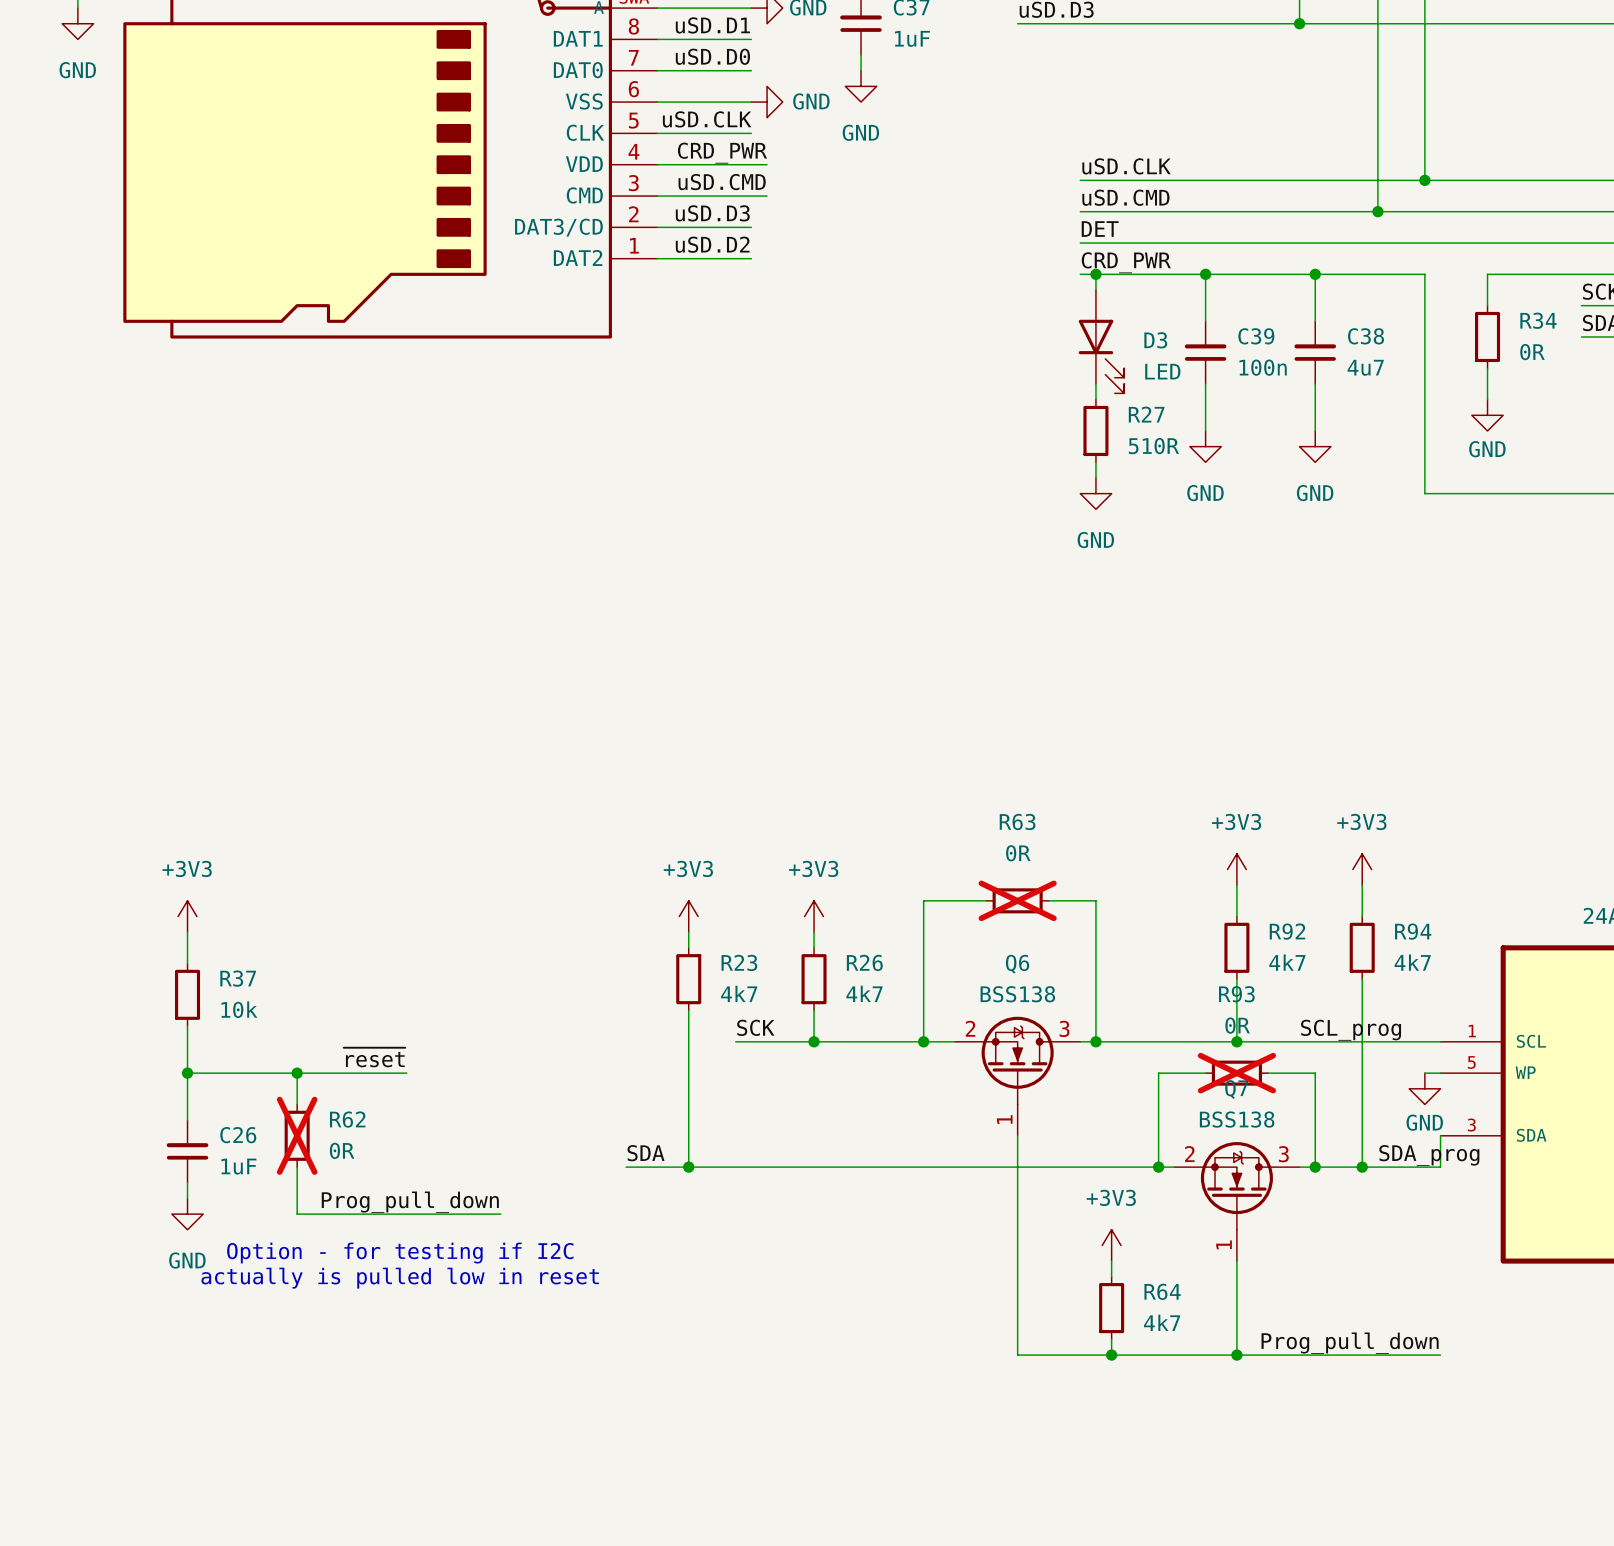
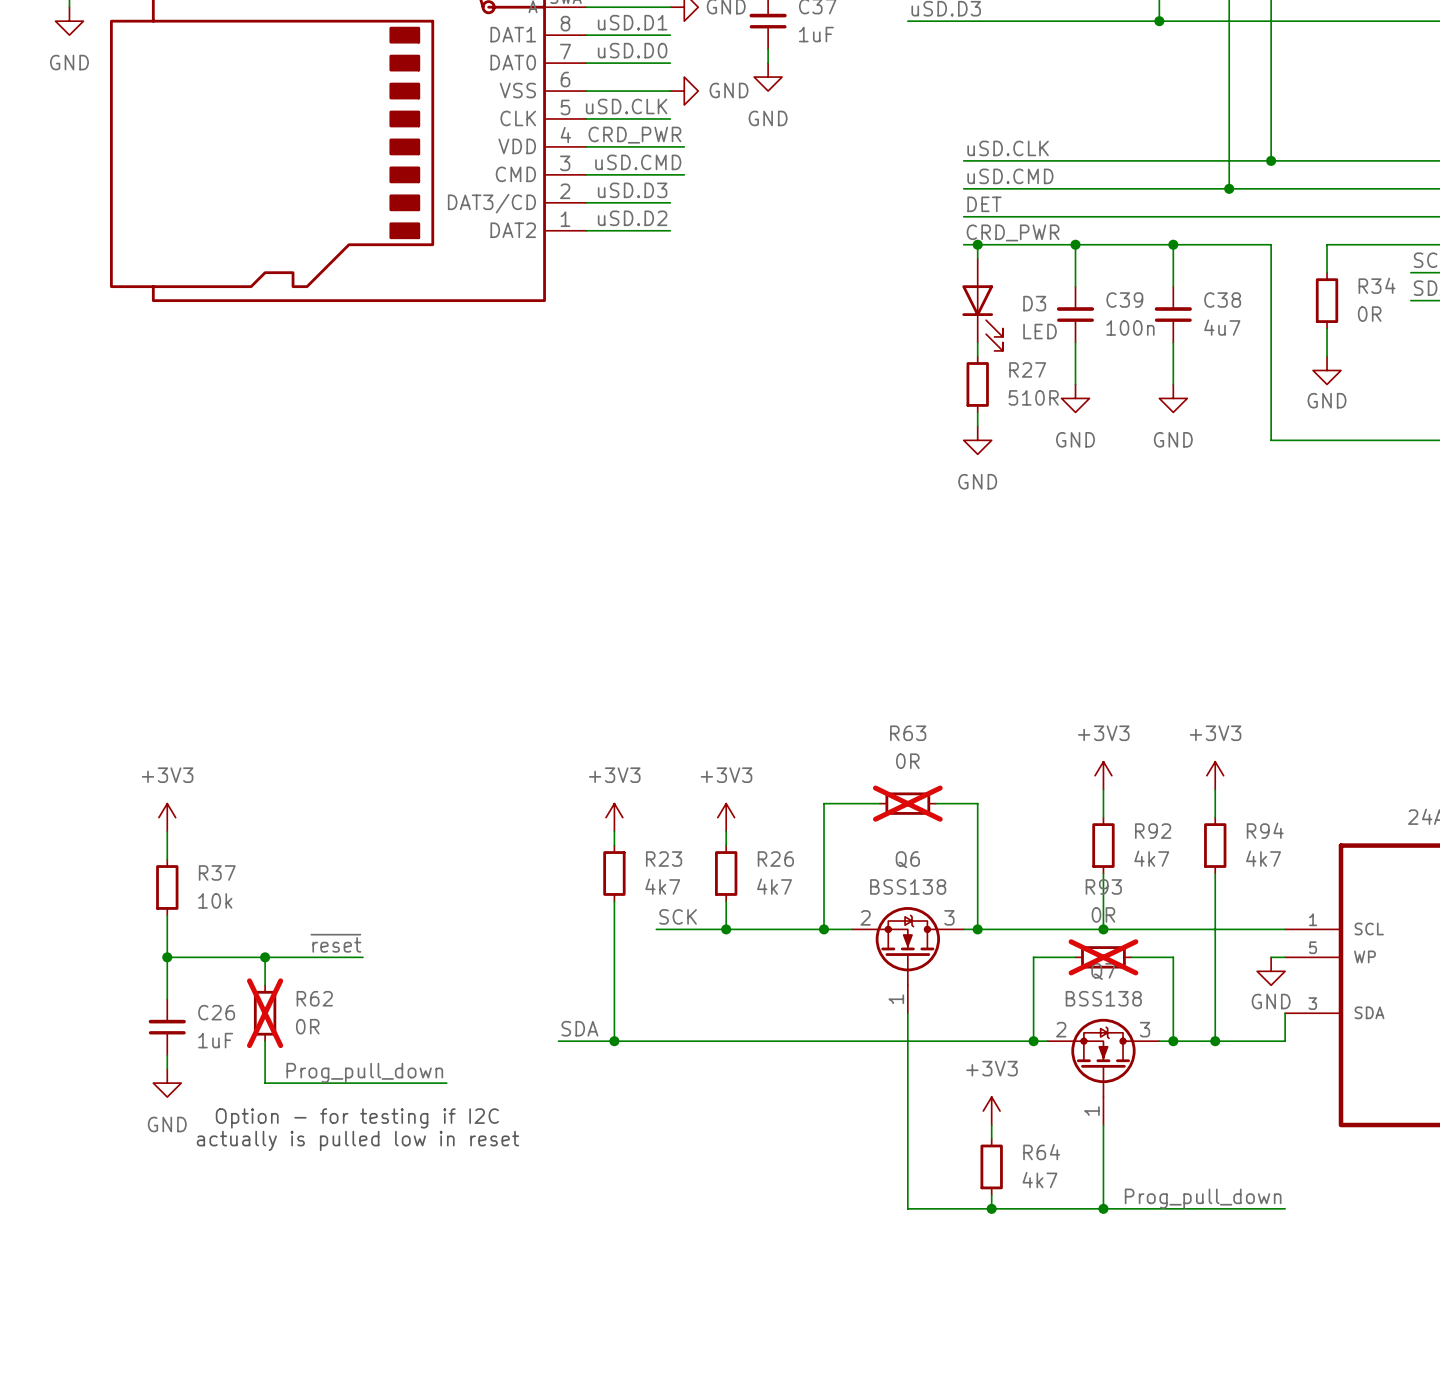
label: SCL_prog (1351, 1030) -> none
label: SDA_prog (1429, 1155) -> none

